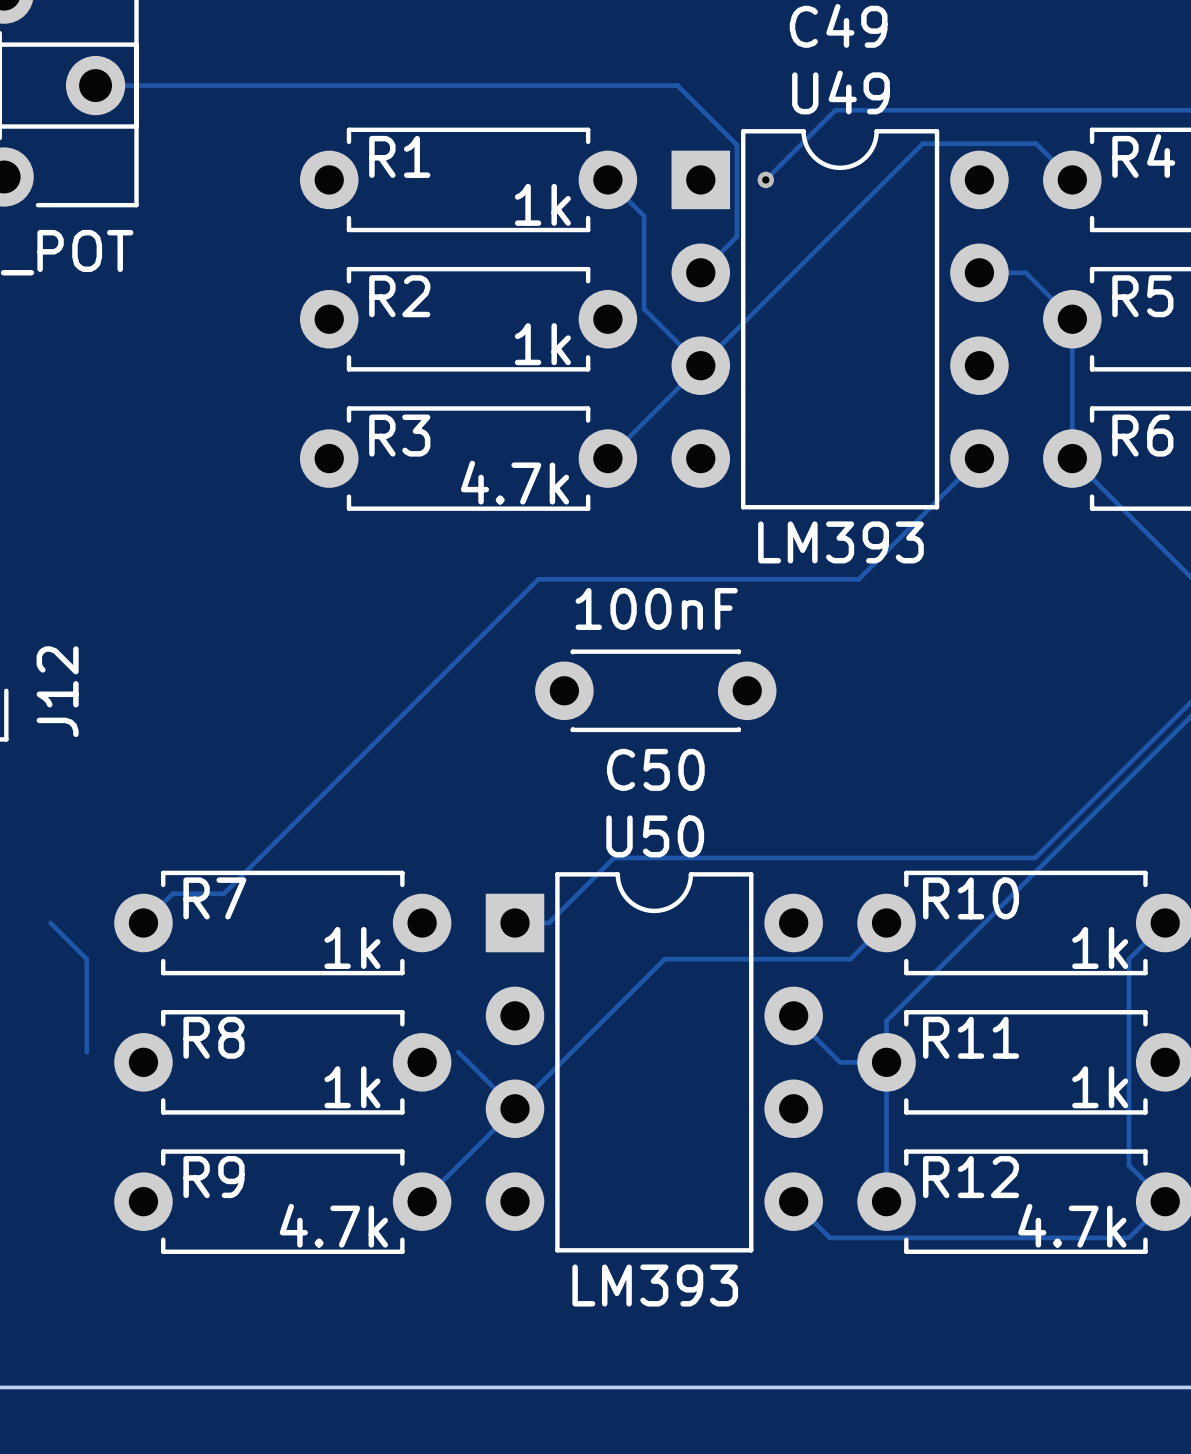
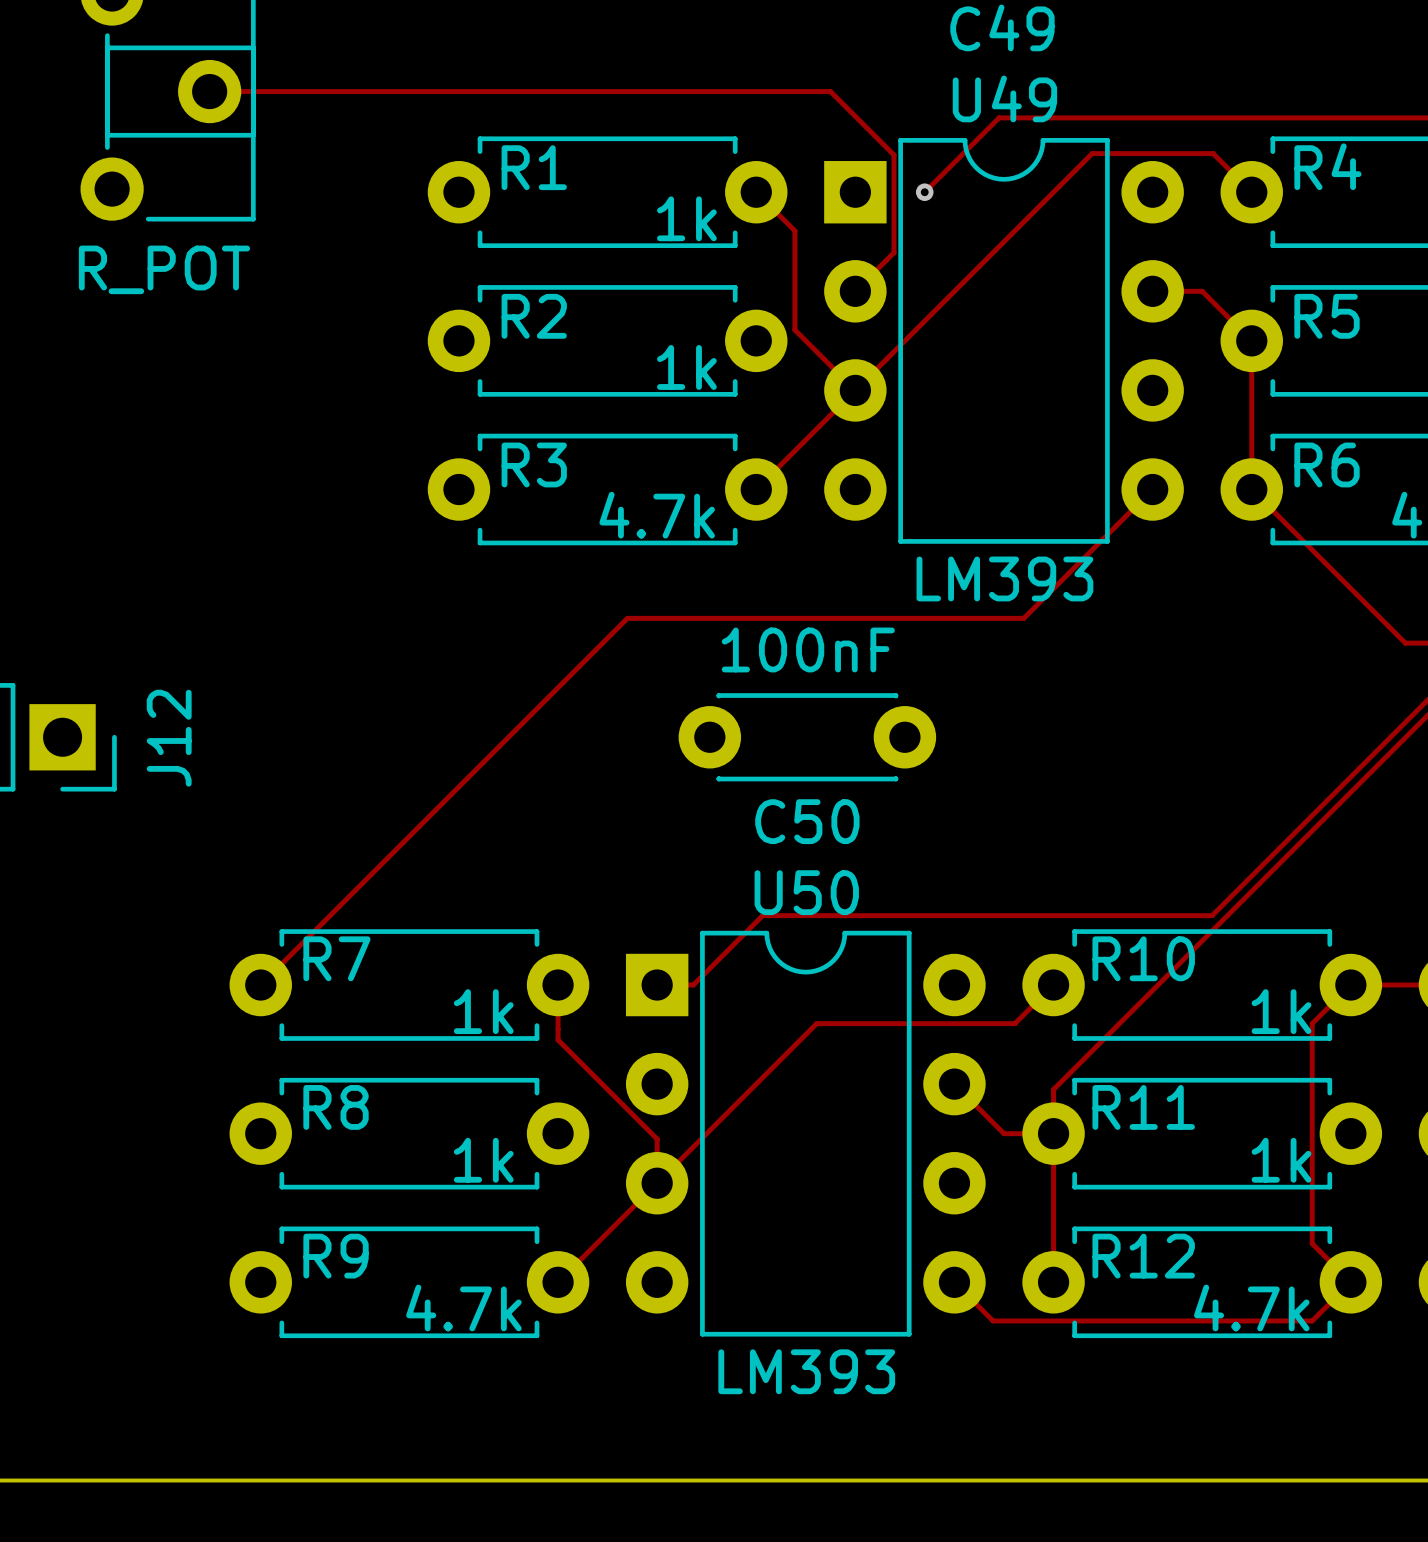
track: (538, 579) (223, 893) (172, 893) -> (681, 618) (627, 618) (291, 953)
track: (50, 923) (86, 959) (86, 1052) -> none
track: (458, 1052) (515, 1108) -> (558, 985) (558, 1039) (657, 1139) (657, 1183)

